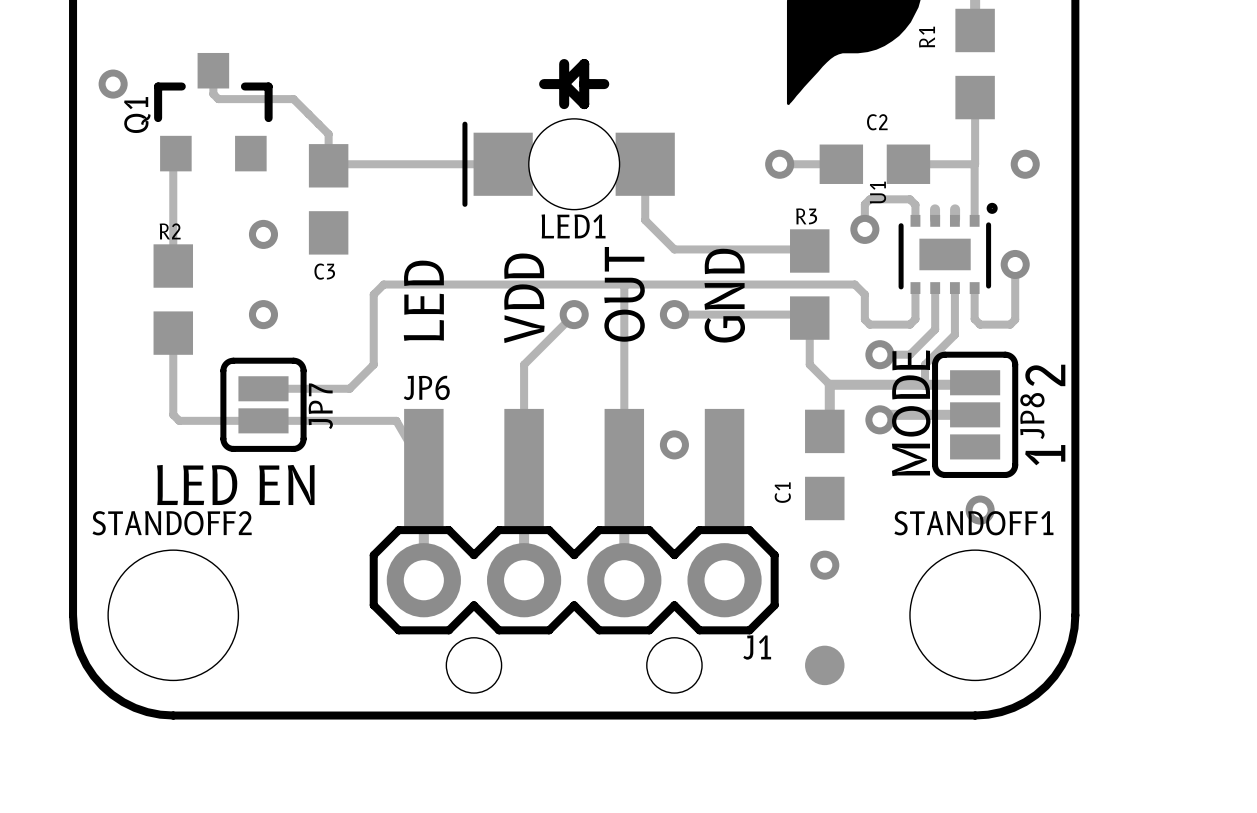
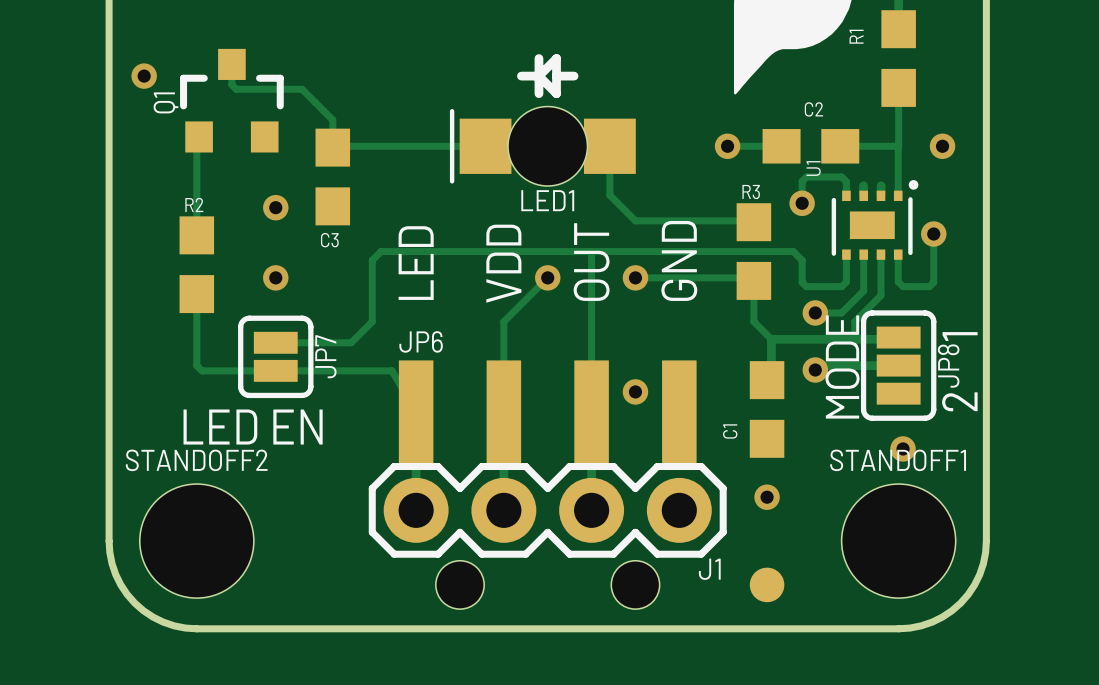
text: 2 (1045, 375) -> 1 (960, 336)
text: 1 (1045, 455) -> 2 (959, 401)

